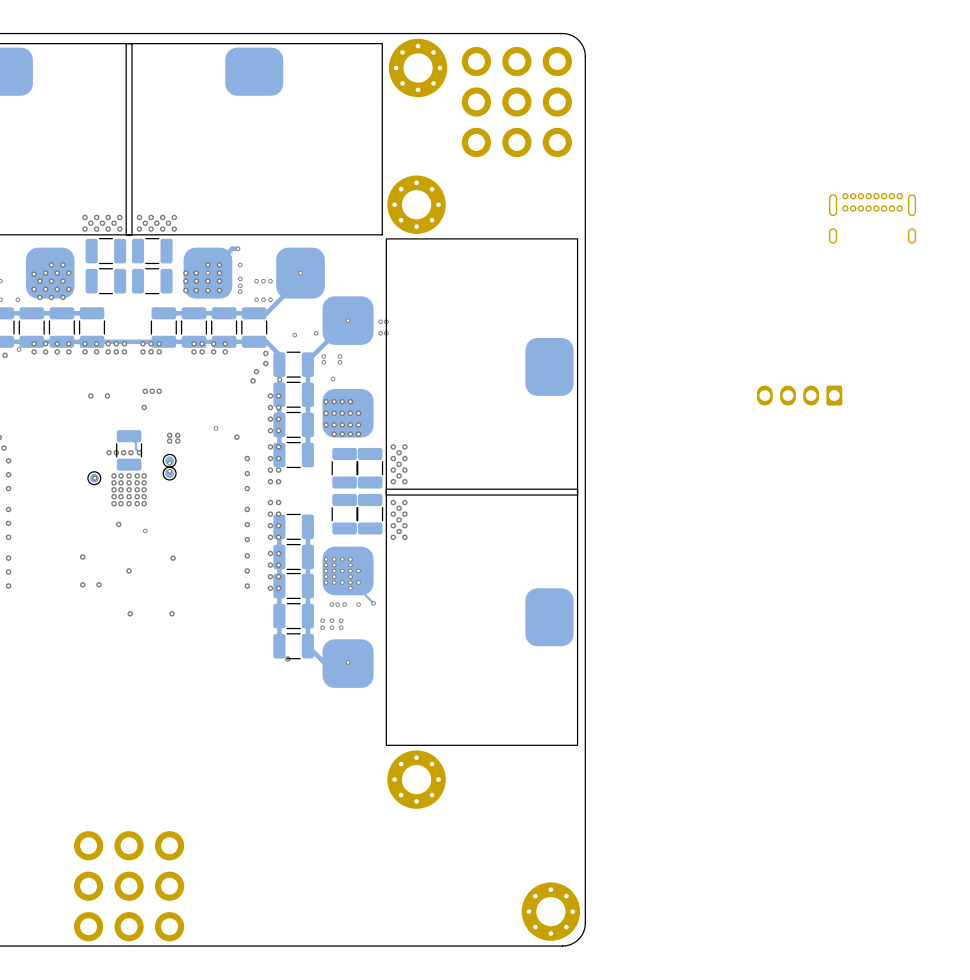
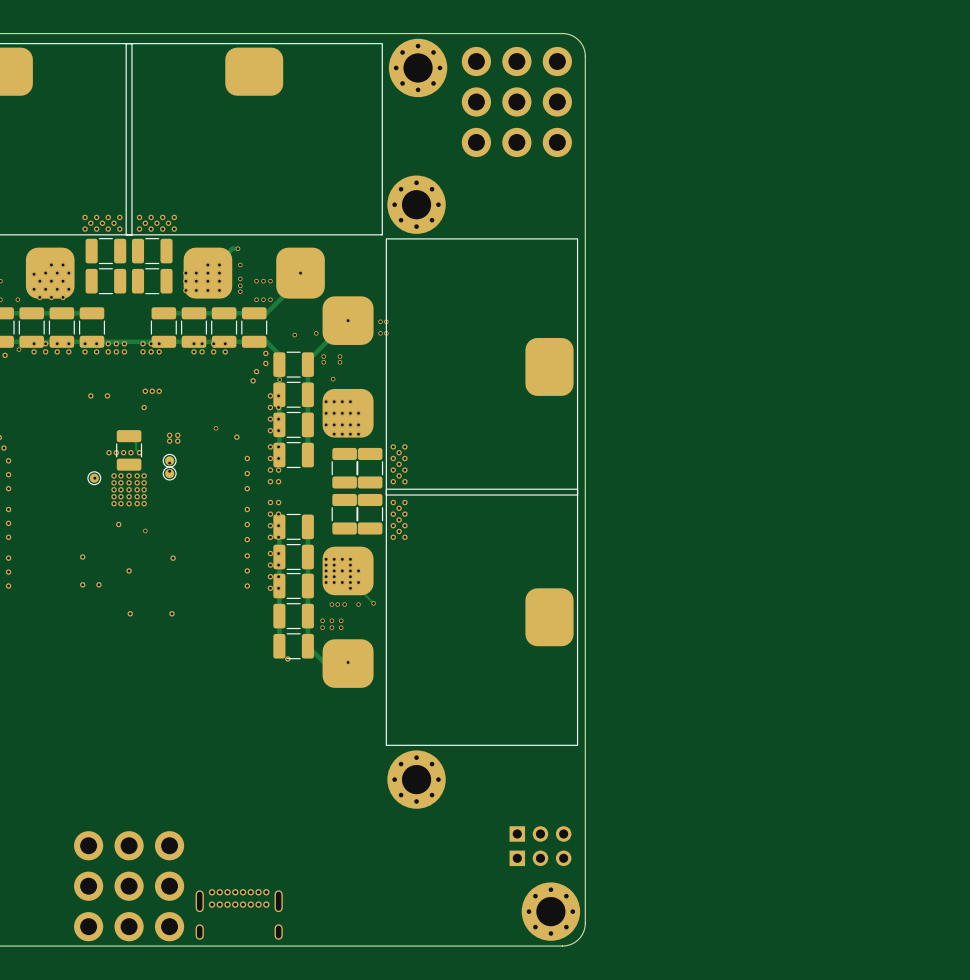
part: (872, 218) -> none
part: (799, 395) -> none
part: none -> (540, 833)
part: none -> (540, 858)
part: none -> (239, 914)

